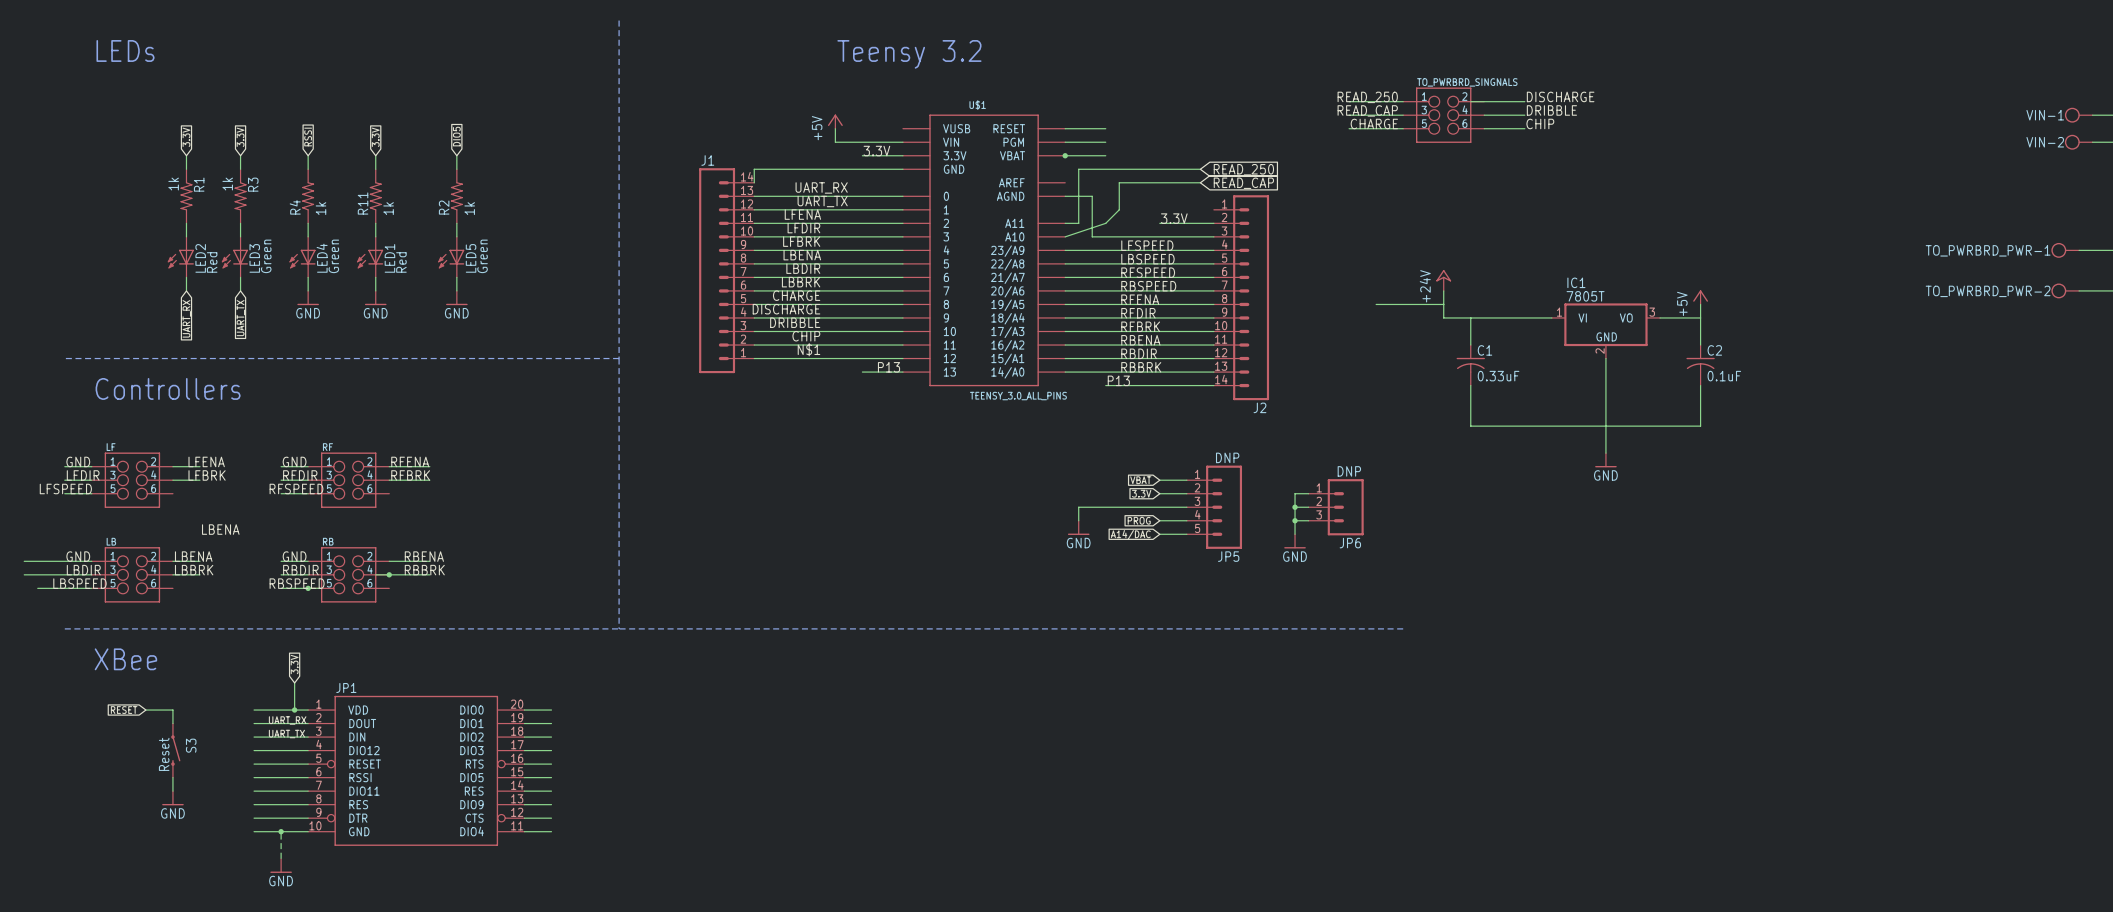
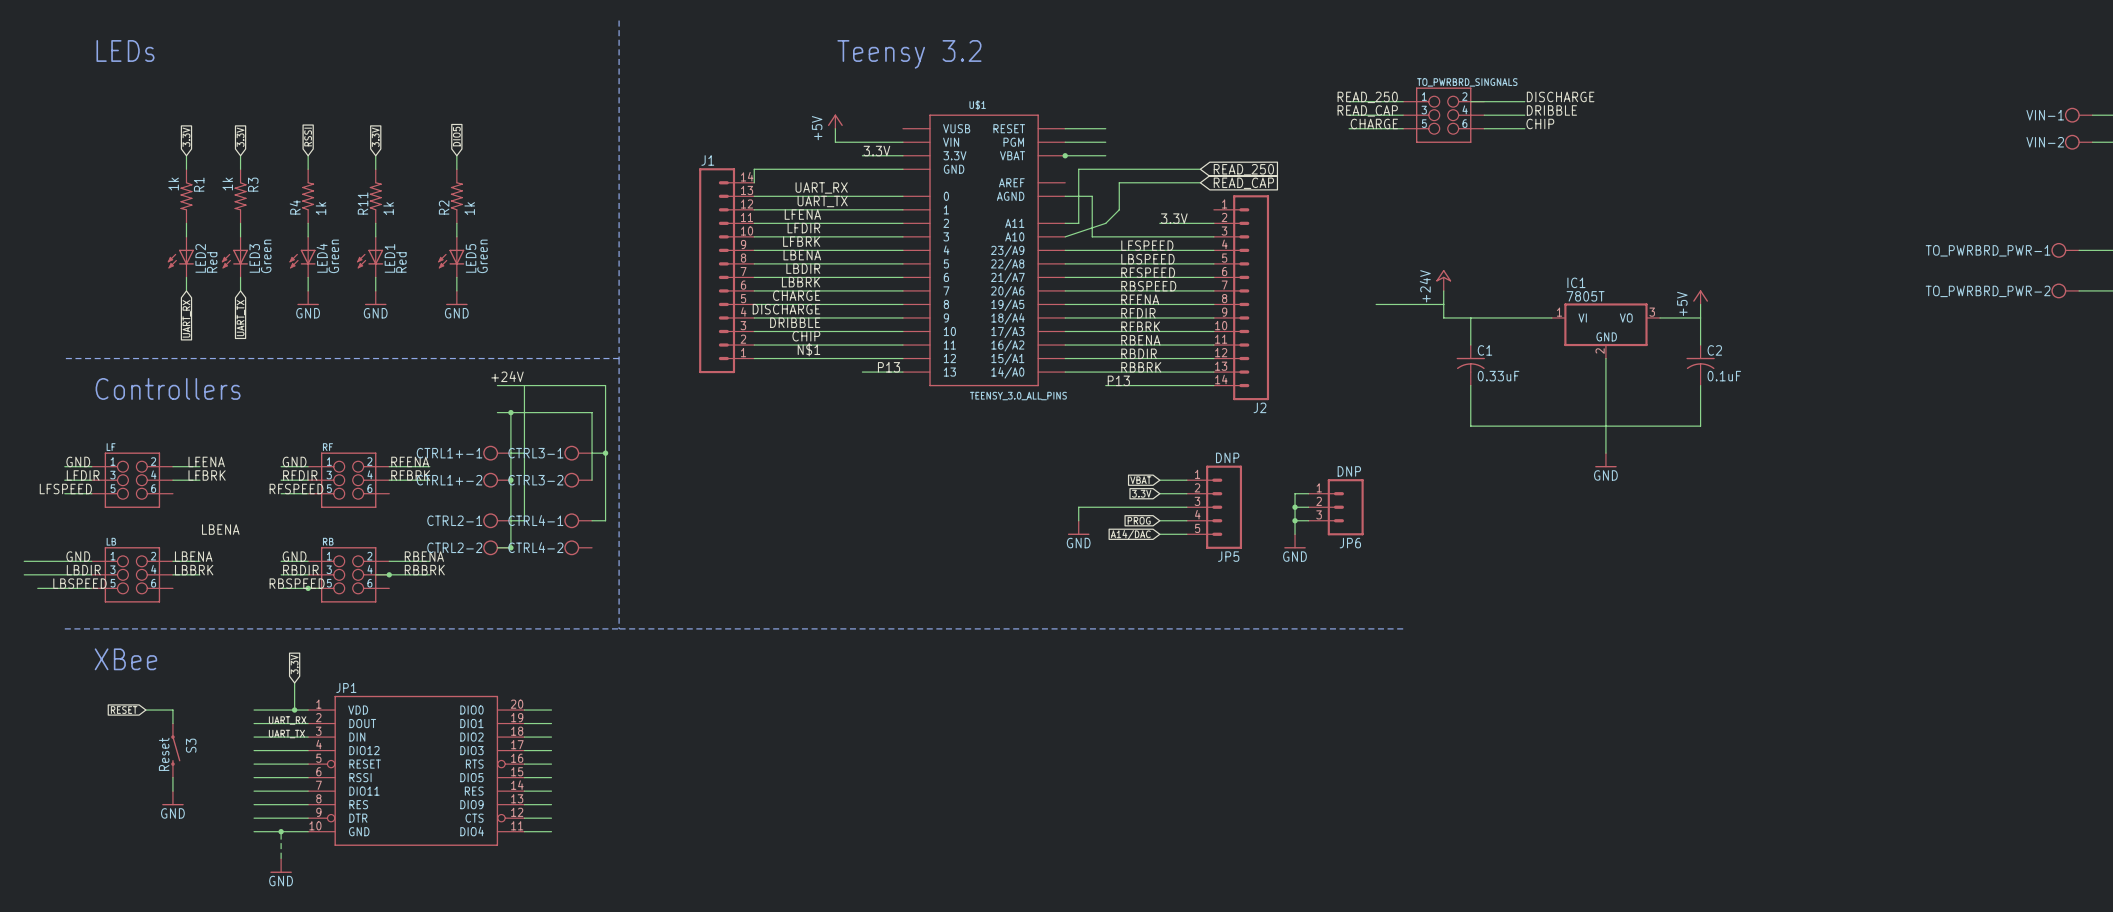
label: none -> +24V (507, 376)
wire: none -> (497, 385) (605, 385) (605, 520) (592, 520)
wire: none -> (524, 385) (524, 520) (510, 520)
wire: none -> (497, 412) (592, 412) (592, 480)
wire: none -> (510, 412) (510, 547) (497, 547)
junction: none -> (510, 412)
CTRL1+-1: none -> (497, 453)
wire: none -> (510, 453) (524, 453)
CTRL3-1: none -> (578, 453)
wire: none -> (592, 453) (605, 453)
junction: none -> (605, 453)
CTRL1+-2: none -> (497, 480)
junction: none -> (510, 480)
CTRL3-2: none -> (578, 480)
CTRL2-1: none -> (497, 520)
CTRL4-1: none -> (578, 520)
CTRL2-2: none -> (497, 547)
junction: none -> (510, 547)
CTRL4-2: none -> (578, 547)

